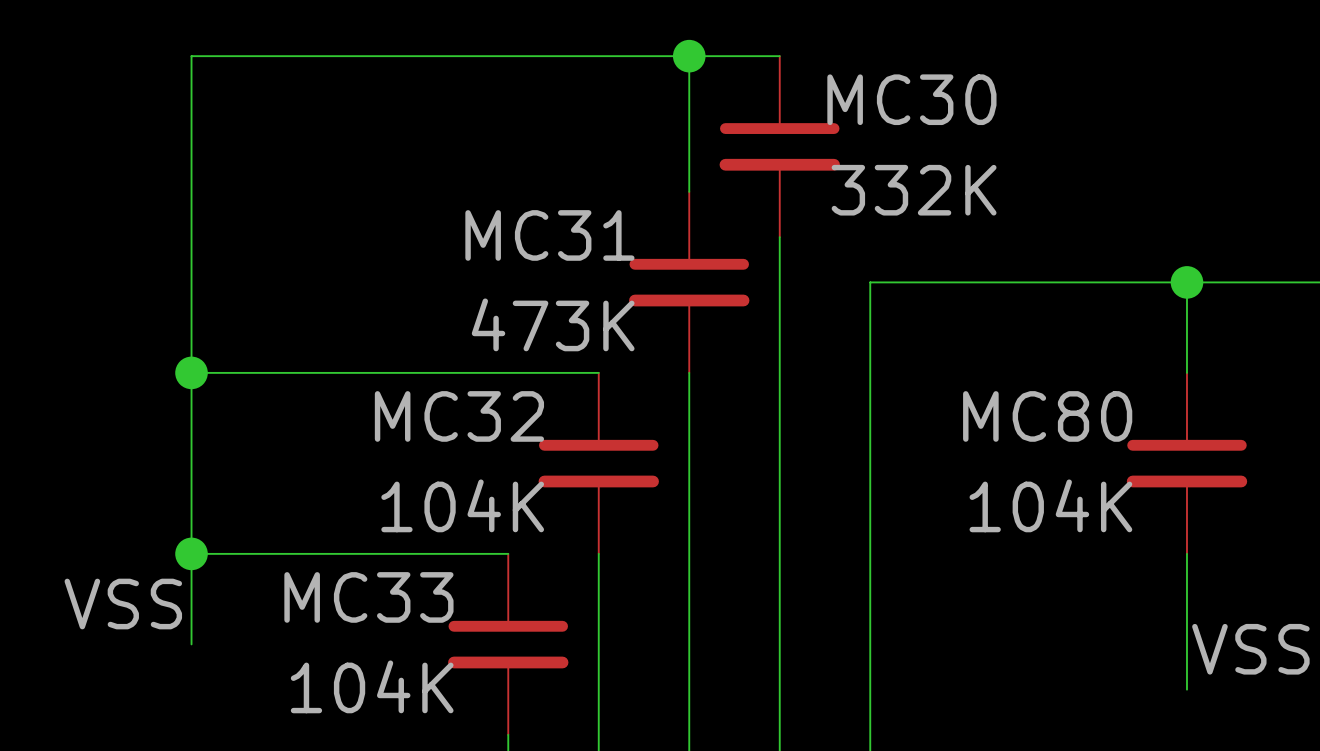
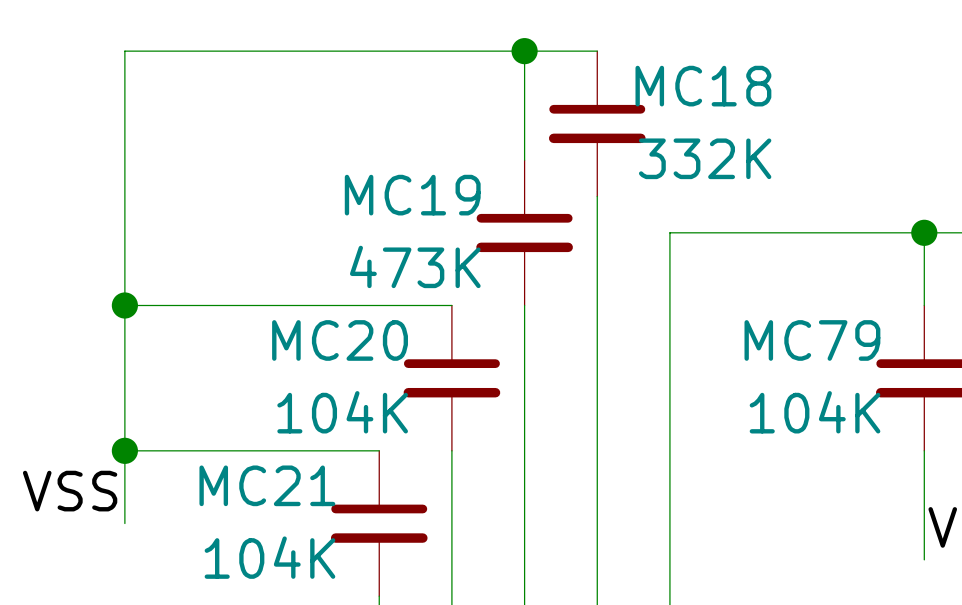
MC30 name: MC30 (911, 99) -> MC18 (703, 86)
MC31 name: MC31 (549, 235) -> MC19 (412, 195)
MC32 name: MC32 (459, 416) -> MC20 (340, 340)
MC80 name: MC80 (1047, 416) -> MC79 (812, 340)
MC33 name: MC33 (368, 597) -> MC21 (267, 485)

